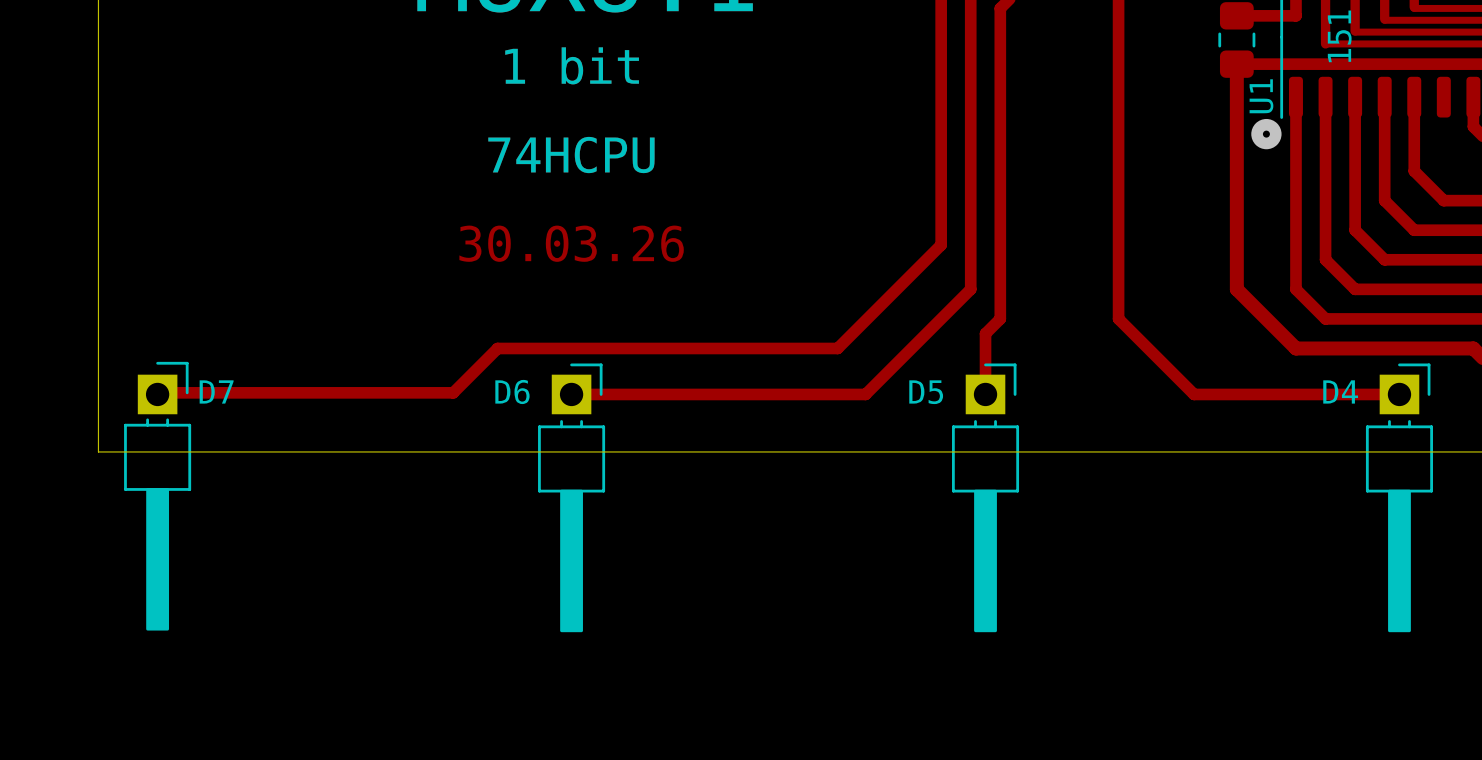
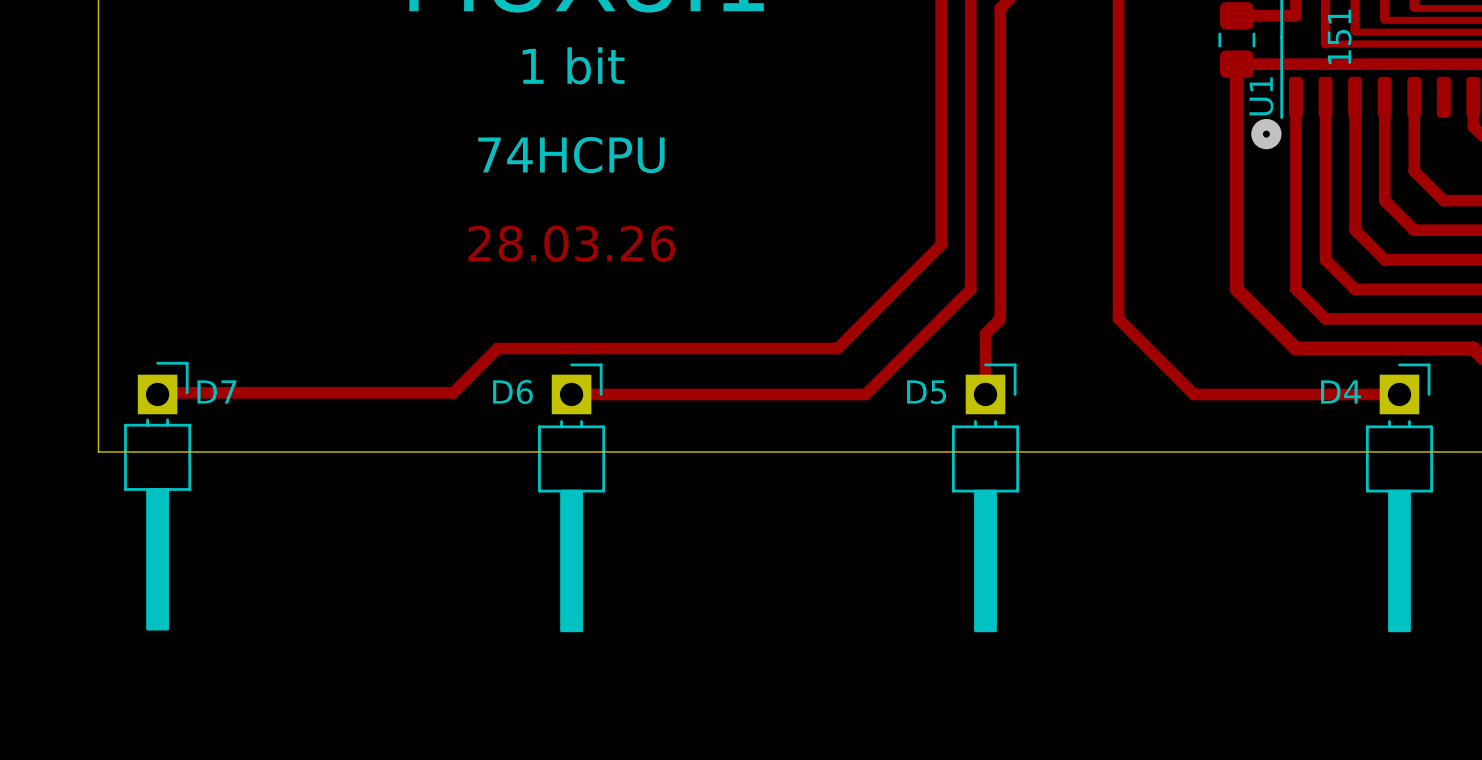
text: 30.03.26 (571, 243) -> 28.03.26 (571, 243)

